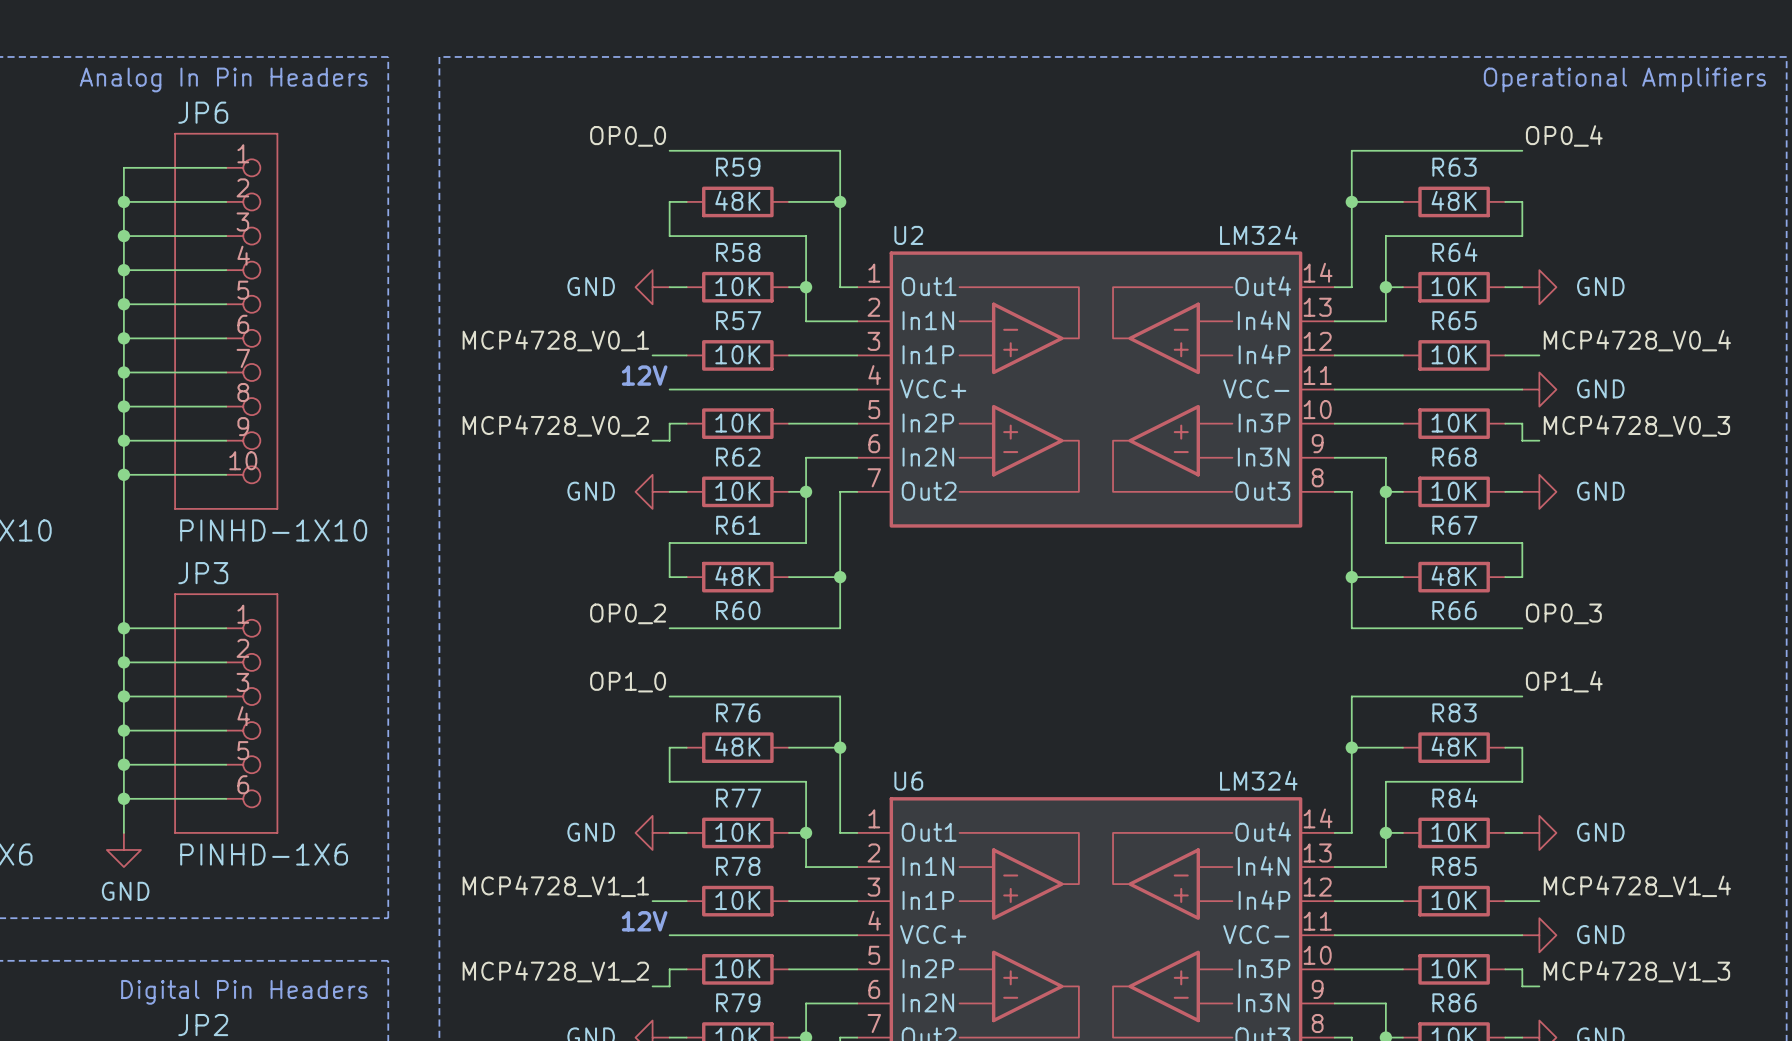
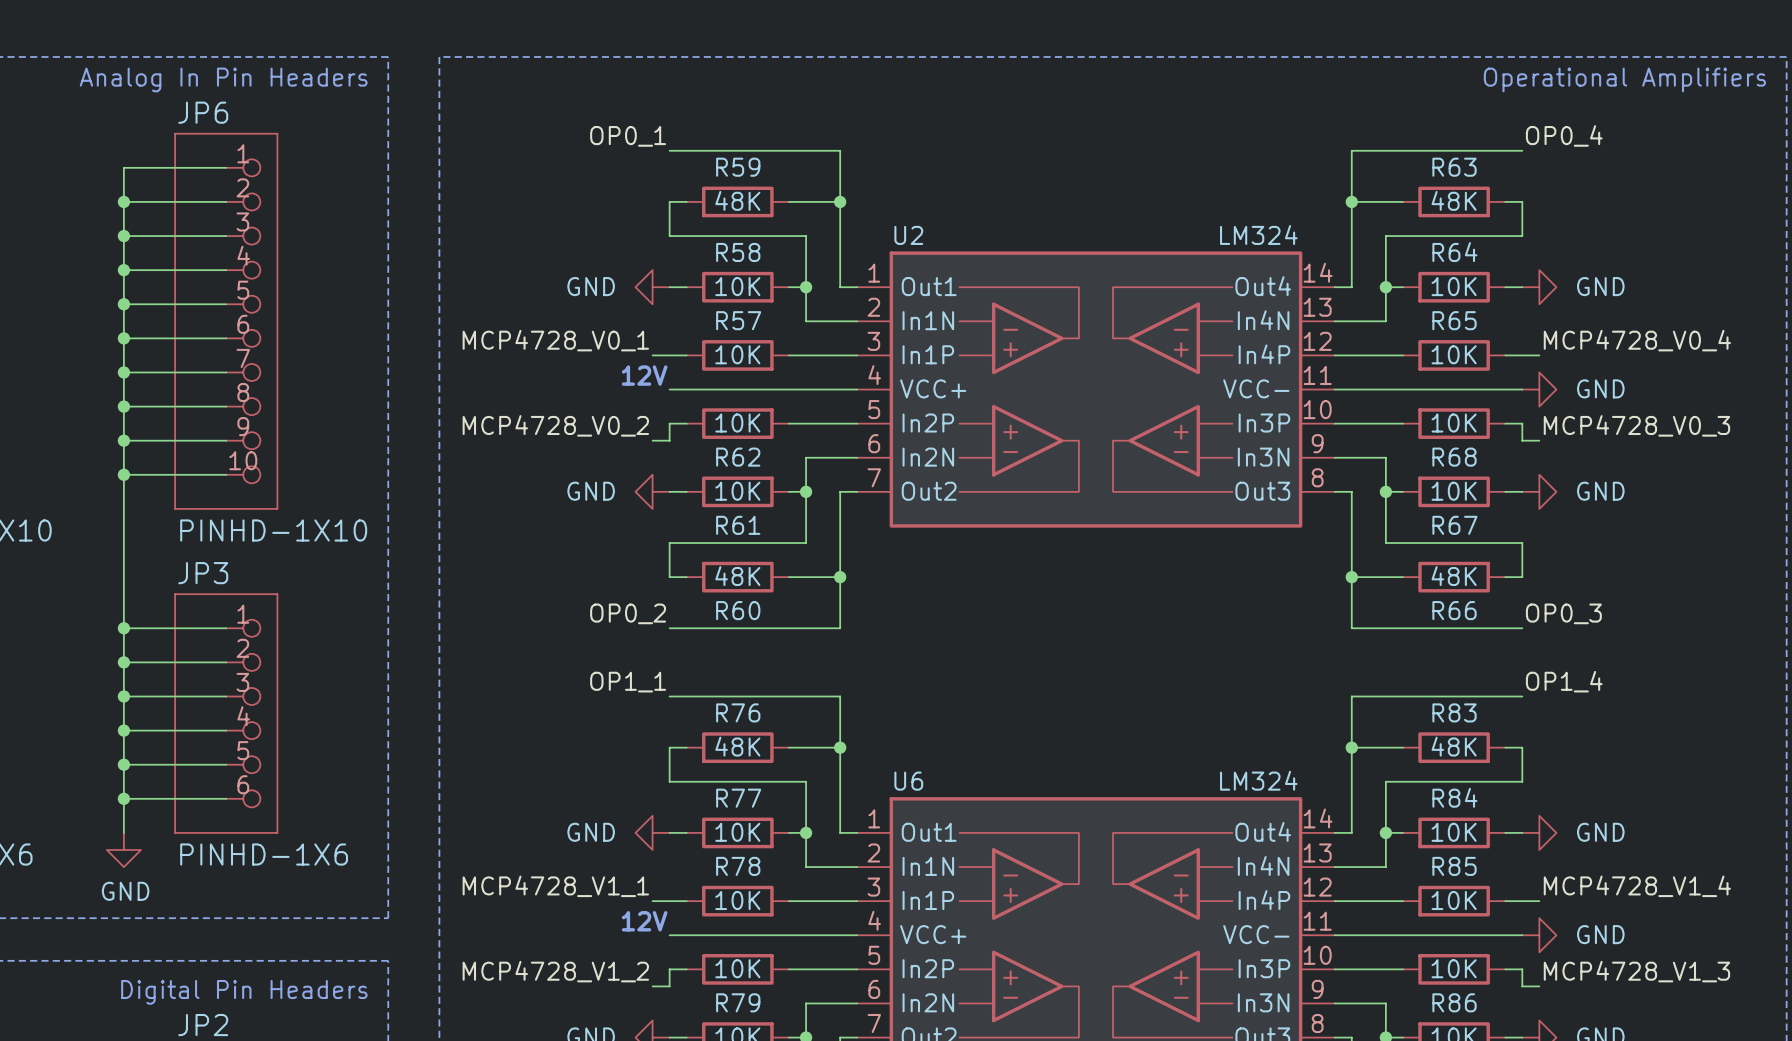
label: OP0_0 (628, 136) -> OP0_1 (628, 136)
label: OP1_0 (628, 682) -> OP1_1 (628, 682)

